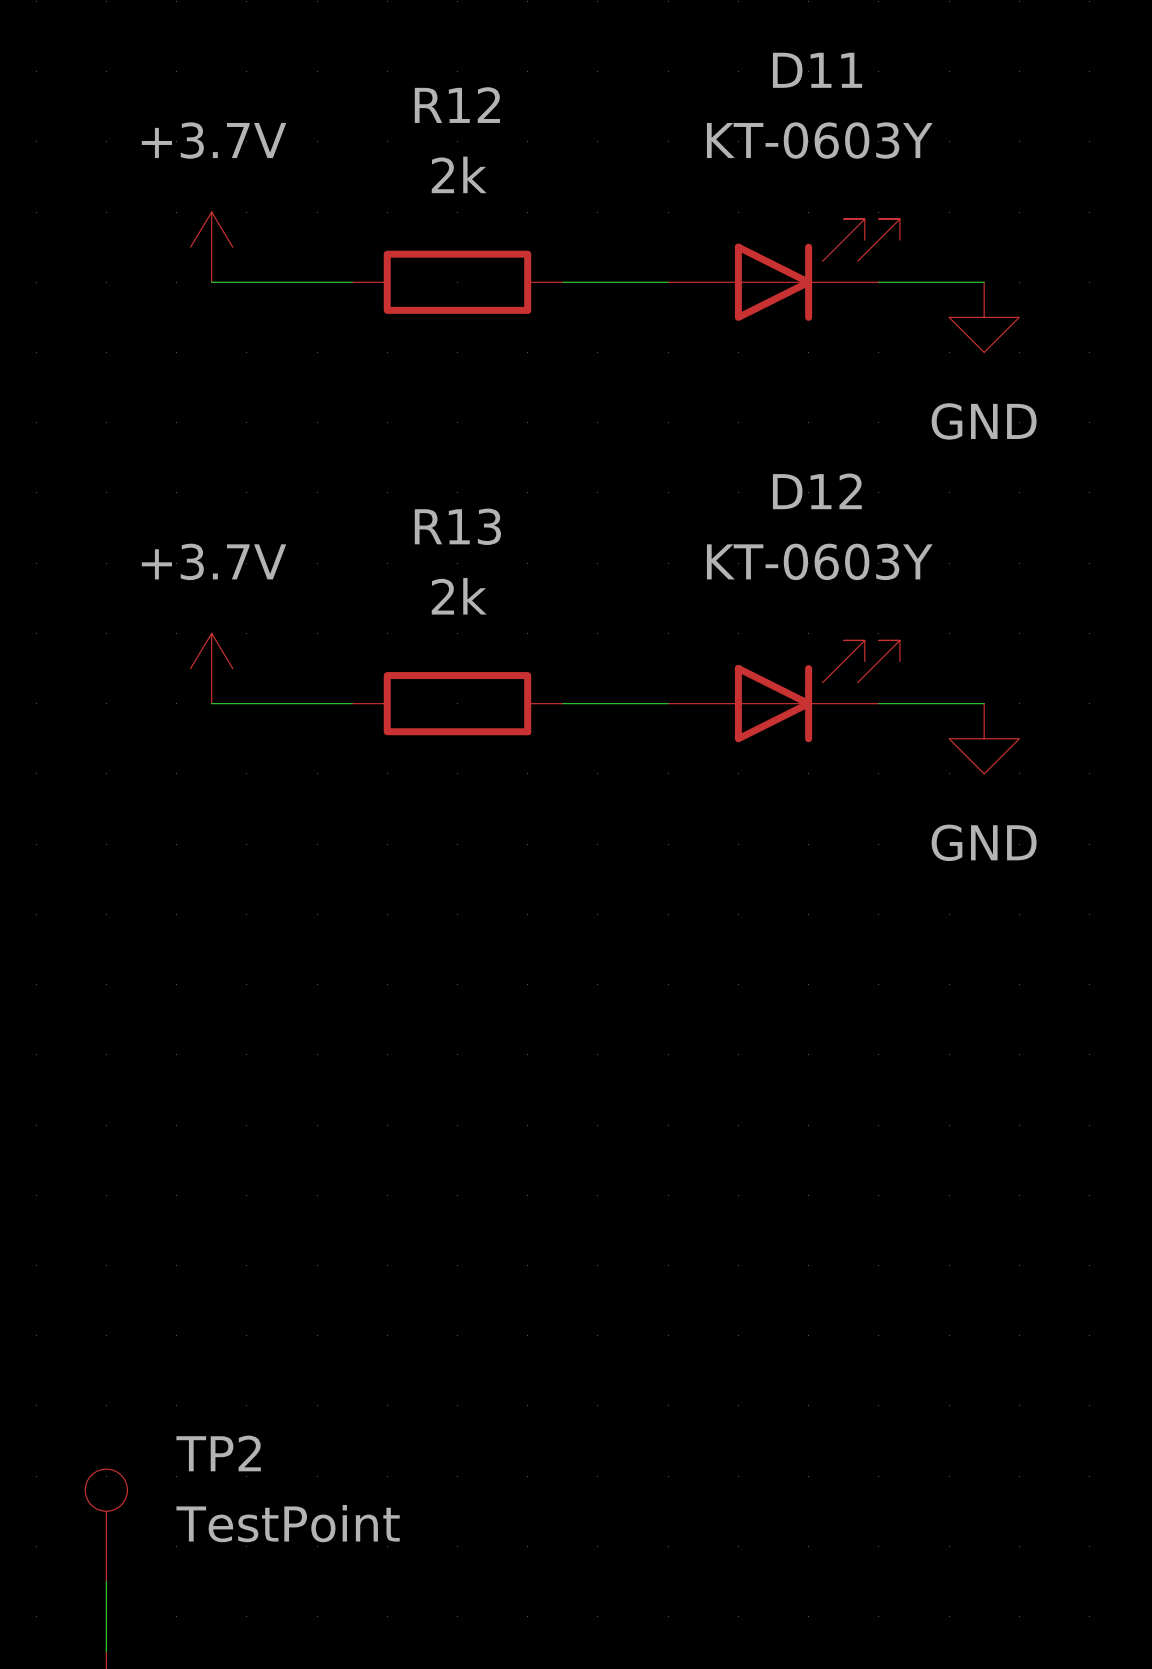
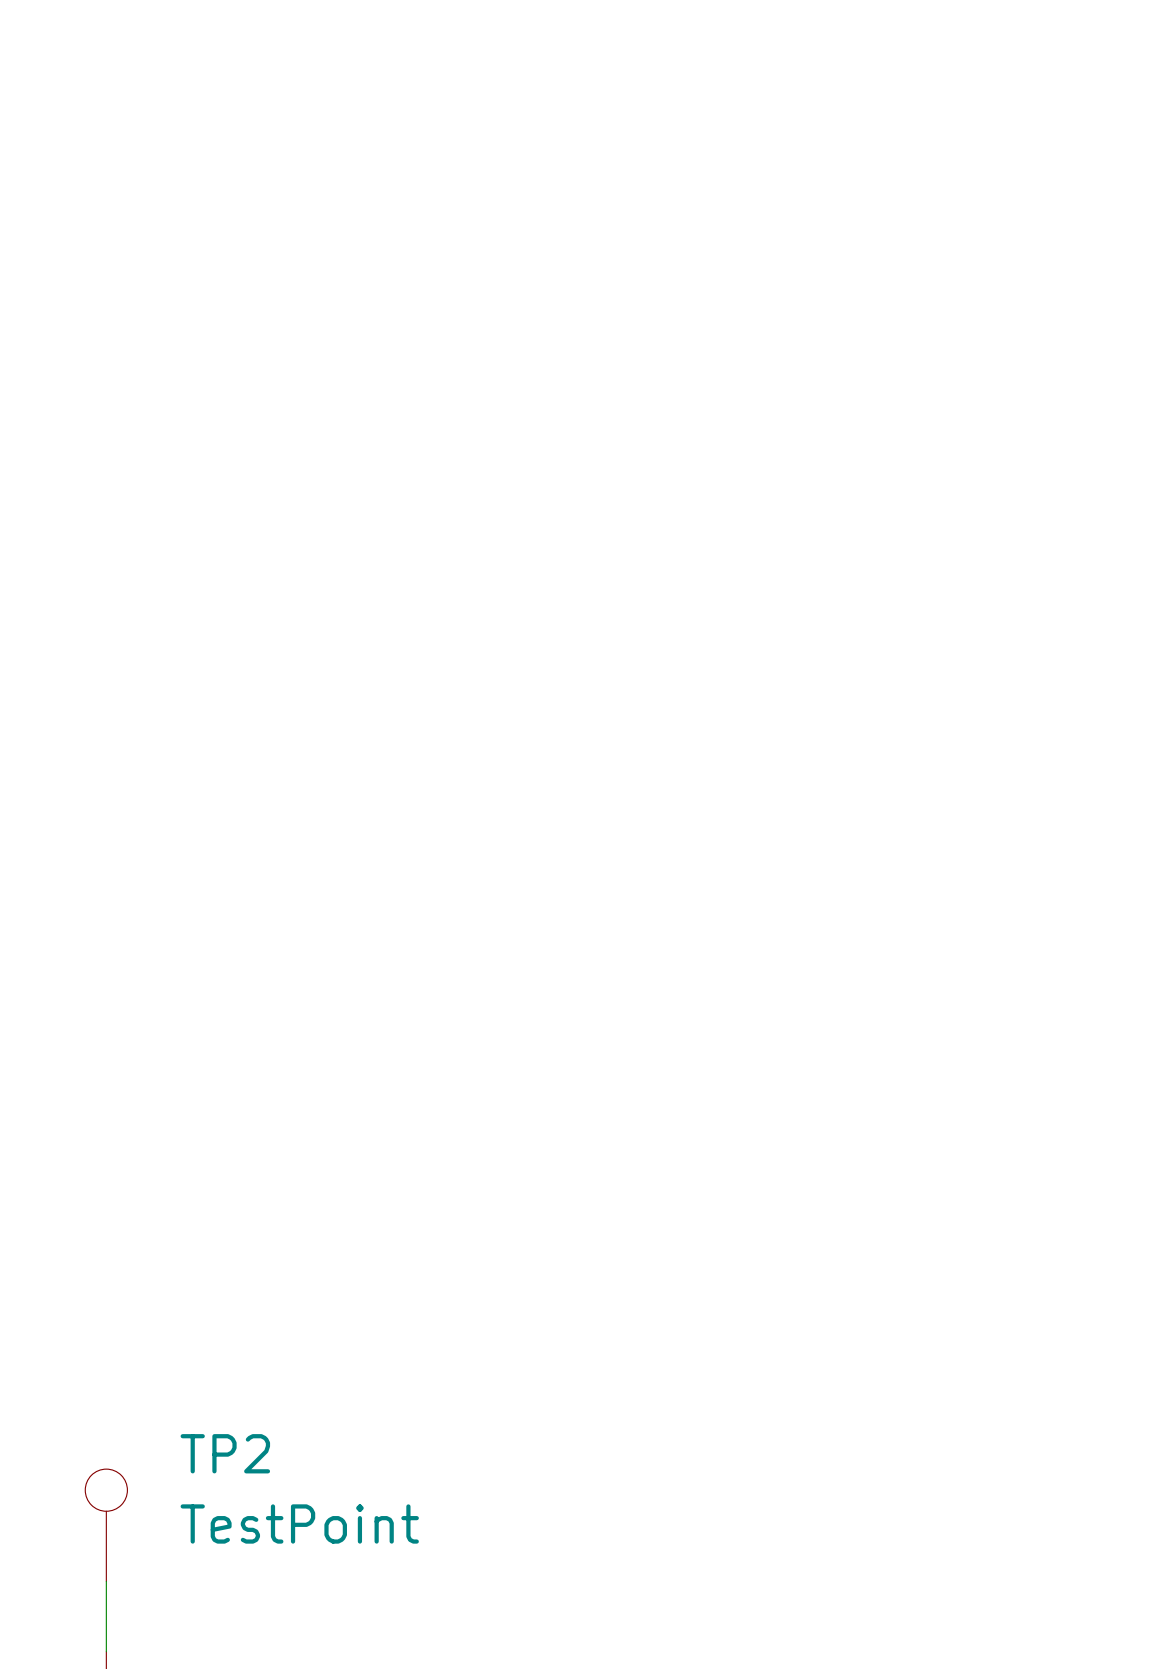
power symbol: +3.7V (211, 247) -> none
D11: KT-0603Y (784, 269) -> none
wire: (211, 282) (352, 282) -> none
R12: 2k (457, 282) -> none
wire: (562, 282) (668, 282) -> none
wire: (878, 282) (984, 282) -> none
power symbol: GND (984, 317) -> none
power symbol: +3.7V (211, 668) -> none
D12: KT-0603Y (784, 691) -> none
wire: (211, 703) (352, 703) -> none
R13: 2k (457, 703) -> none
wire: (562, 703) (668, 703) -> none
wire: (878, 703) (984, 703) -> none
power symbol: GND (984, 738) -> none

